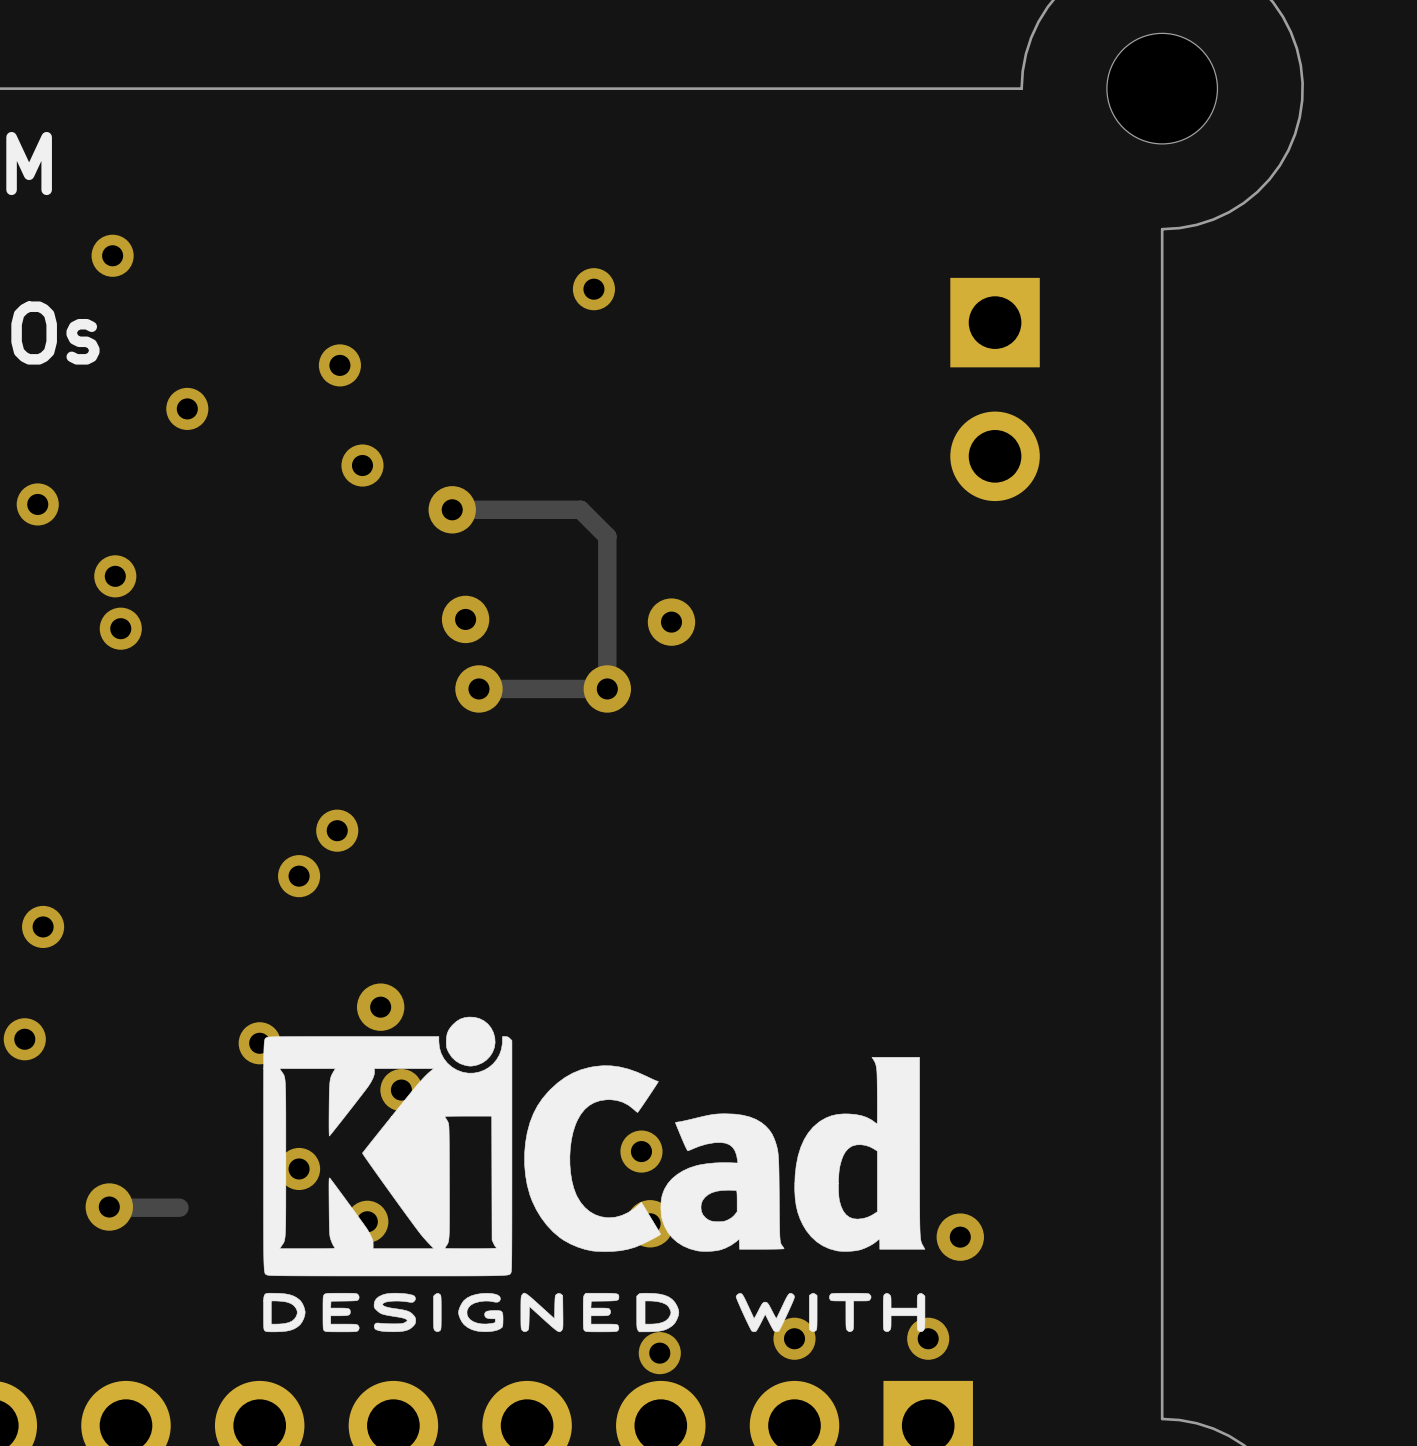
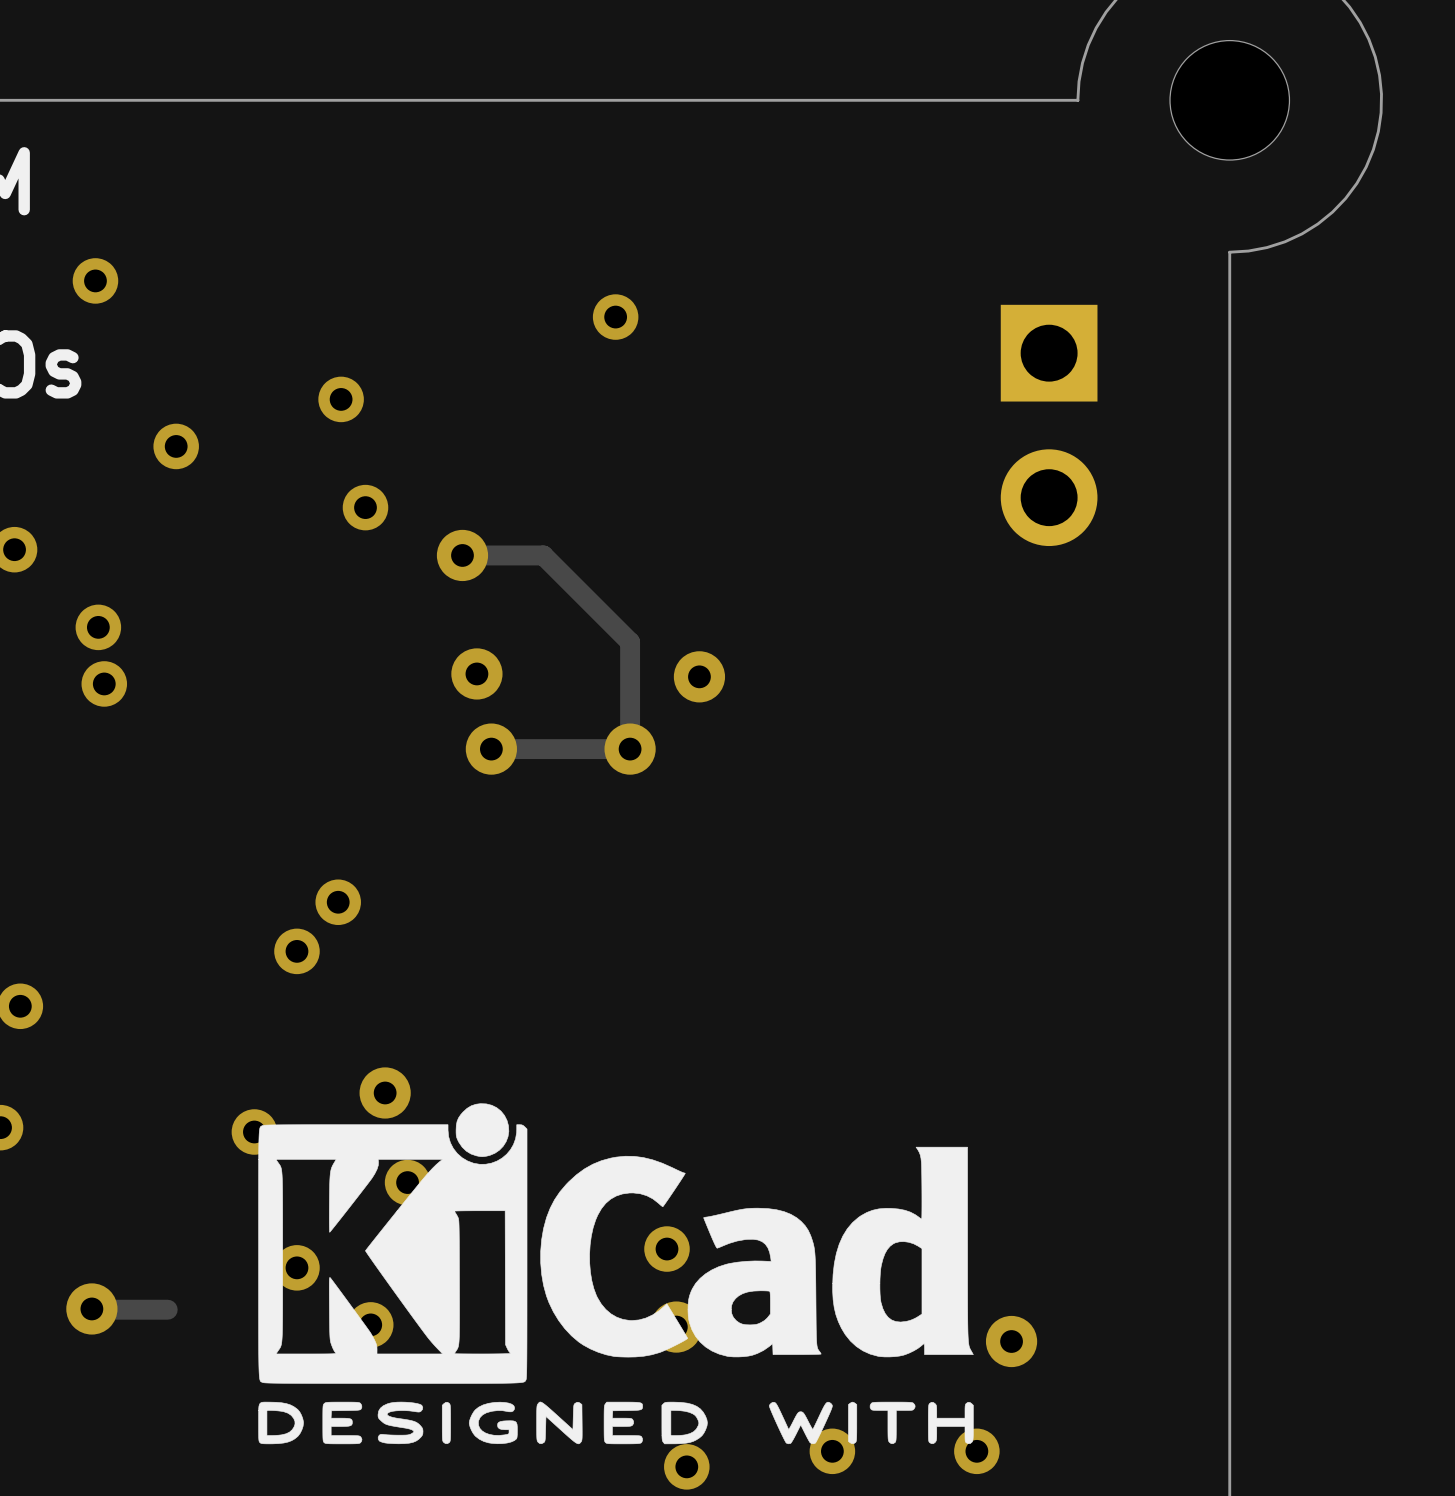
track: (527, 509) (580, 509) (607, 536) (607, 590) -> (543, 555) (630, 642)

